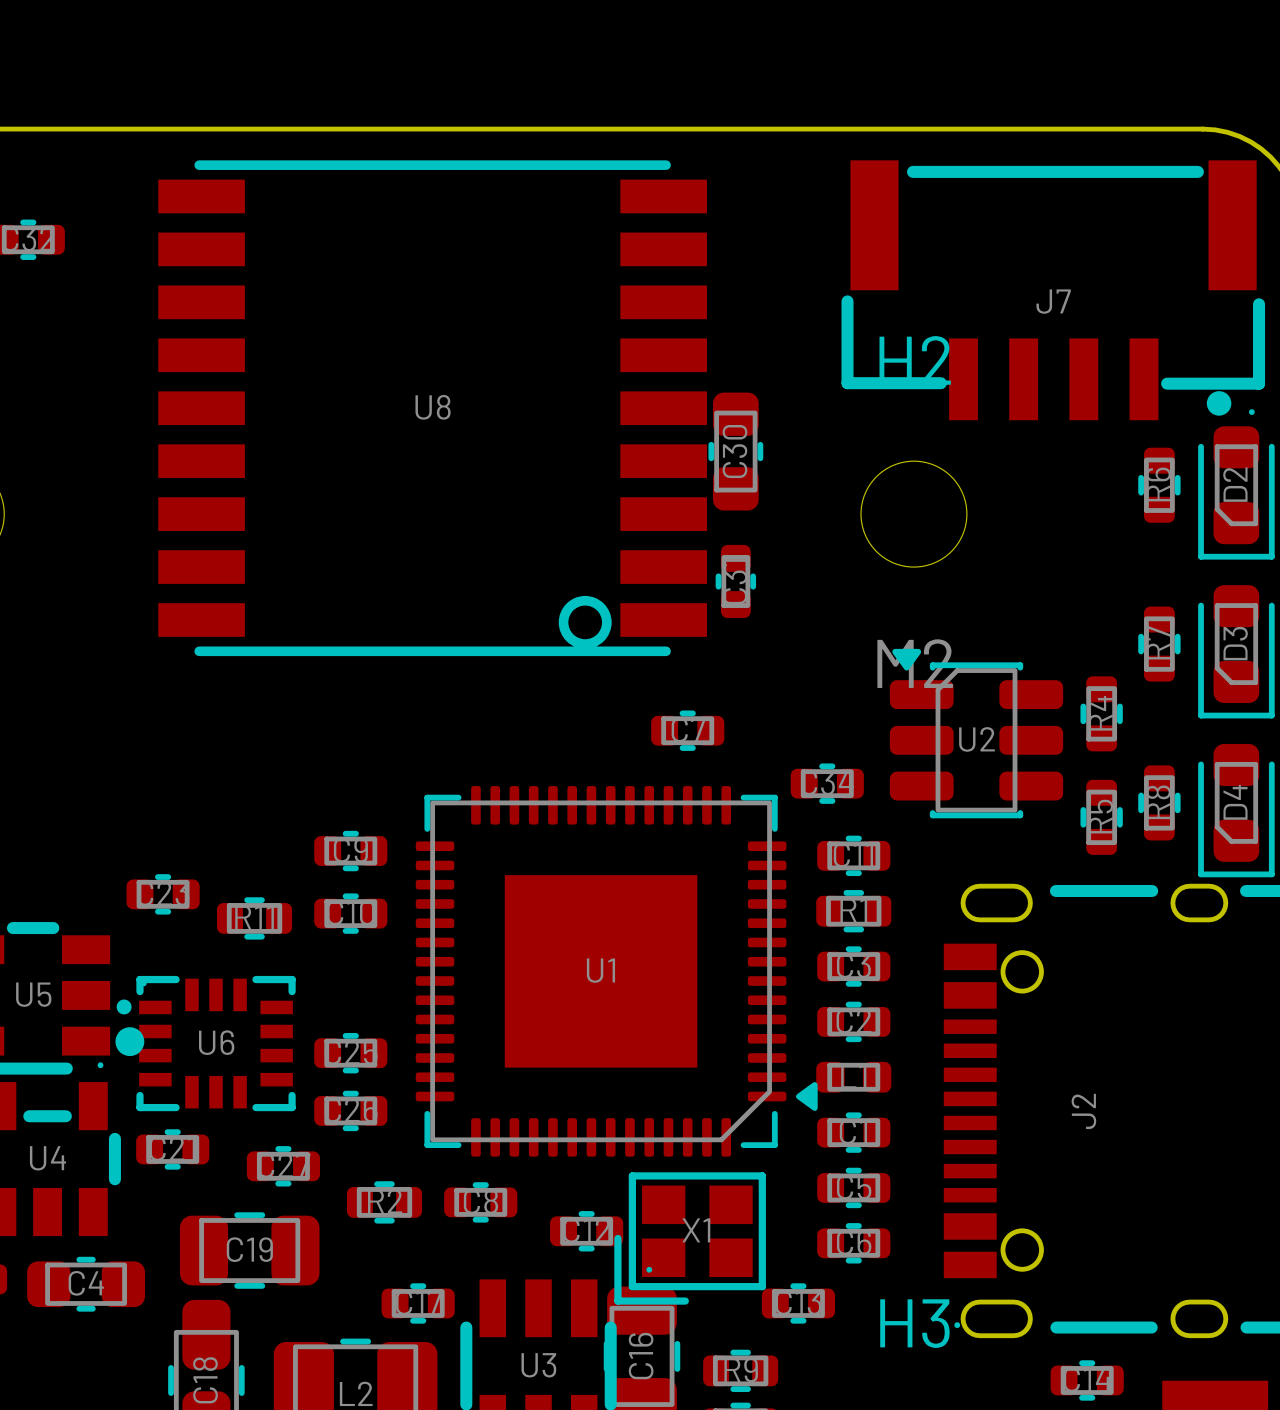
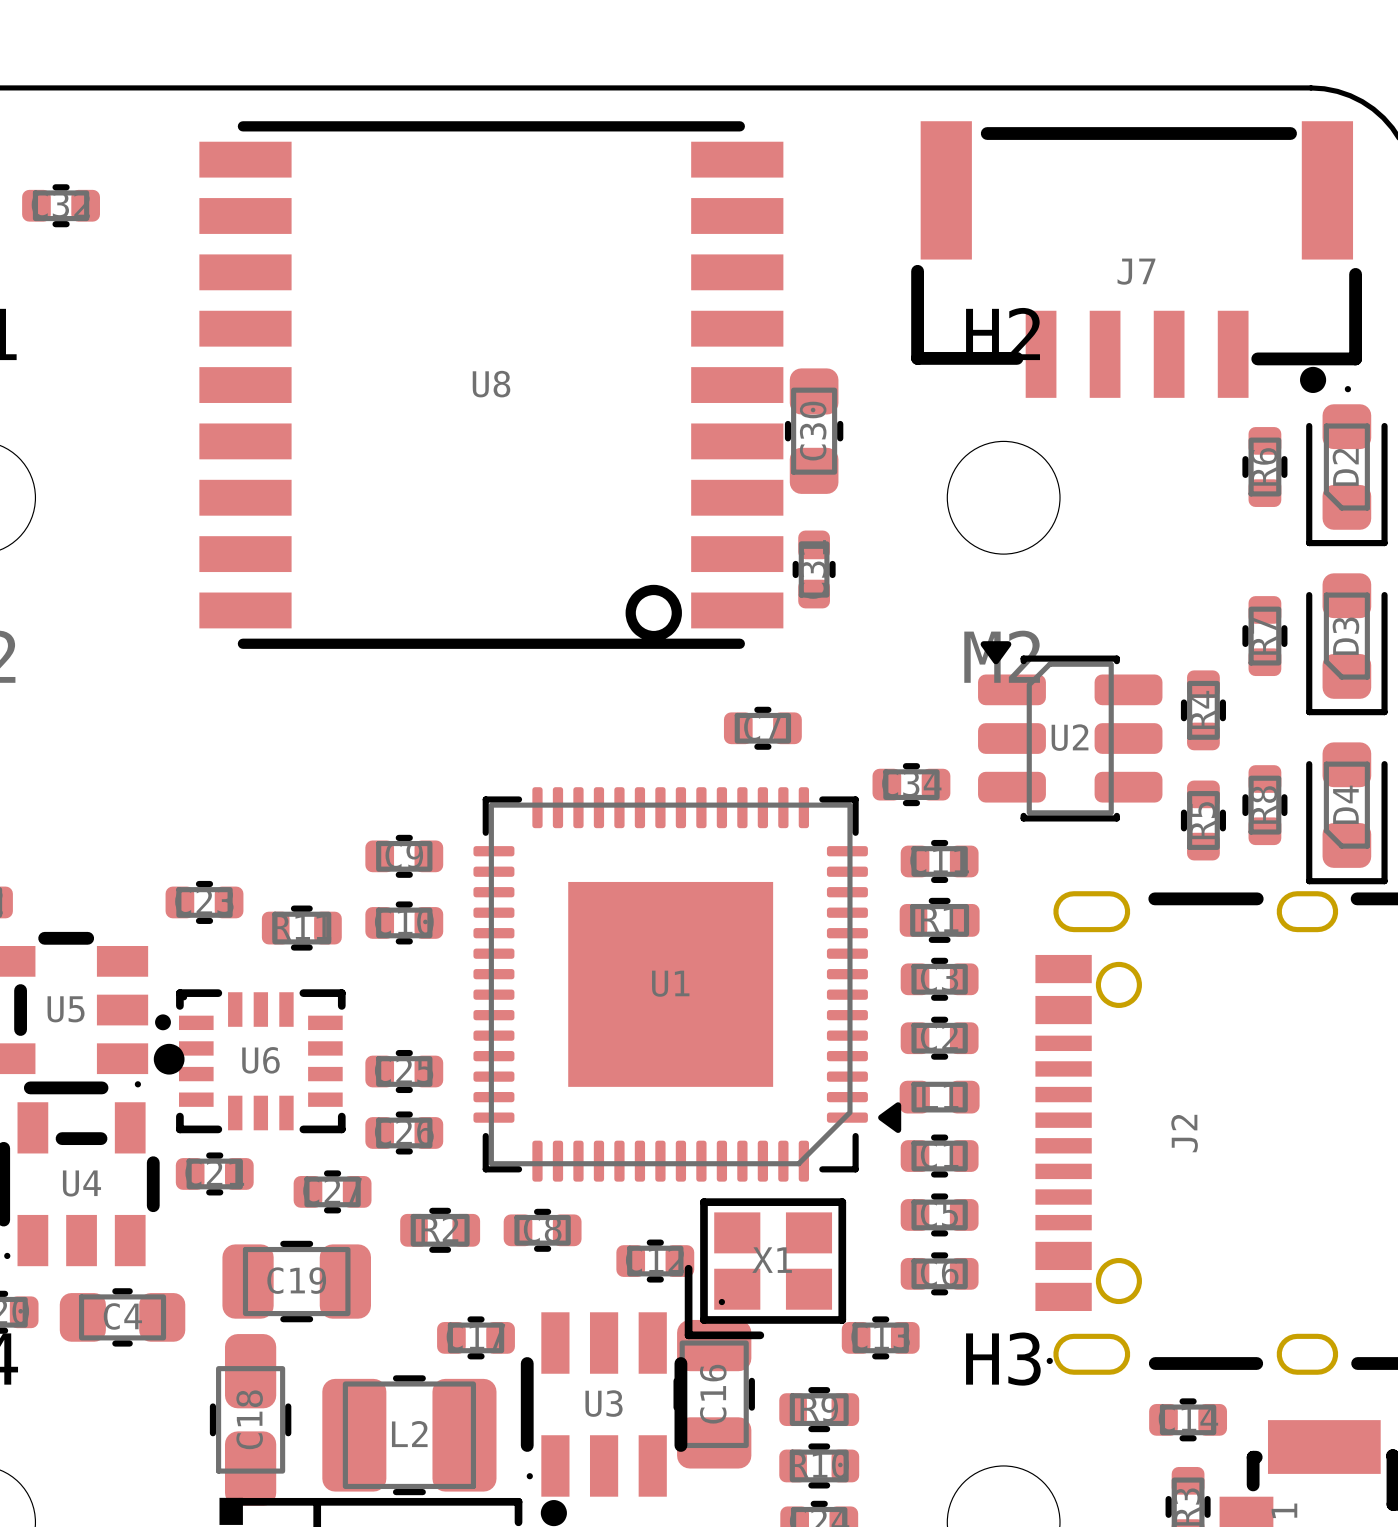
J7 position: (1053, 290) -> (1136, 259)

